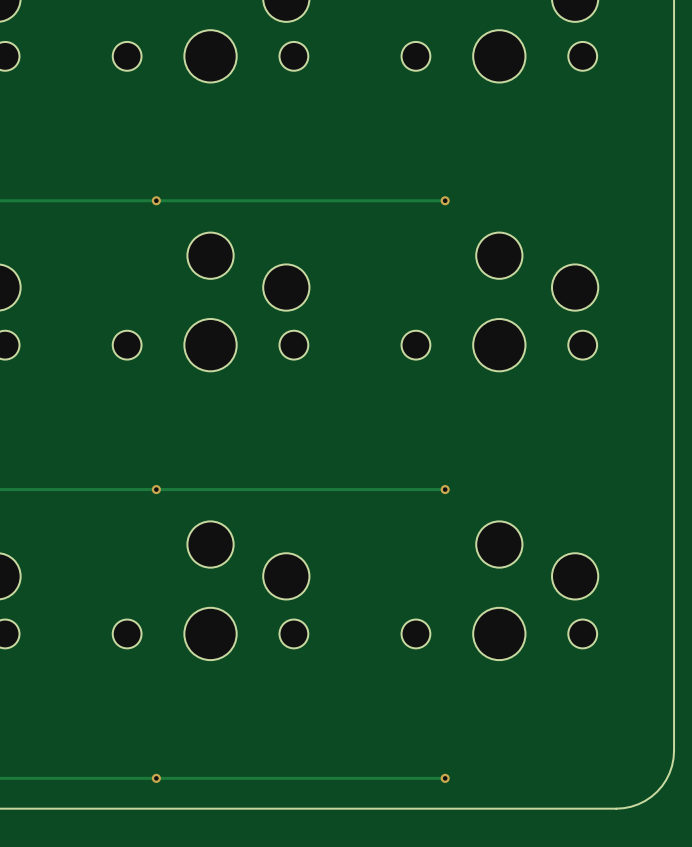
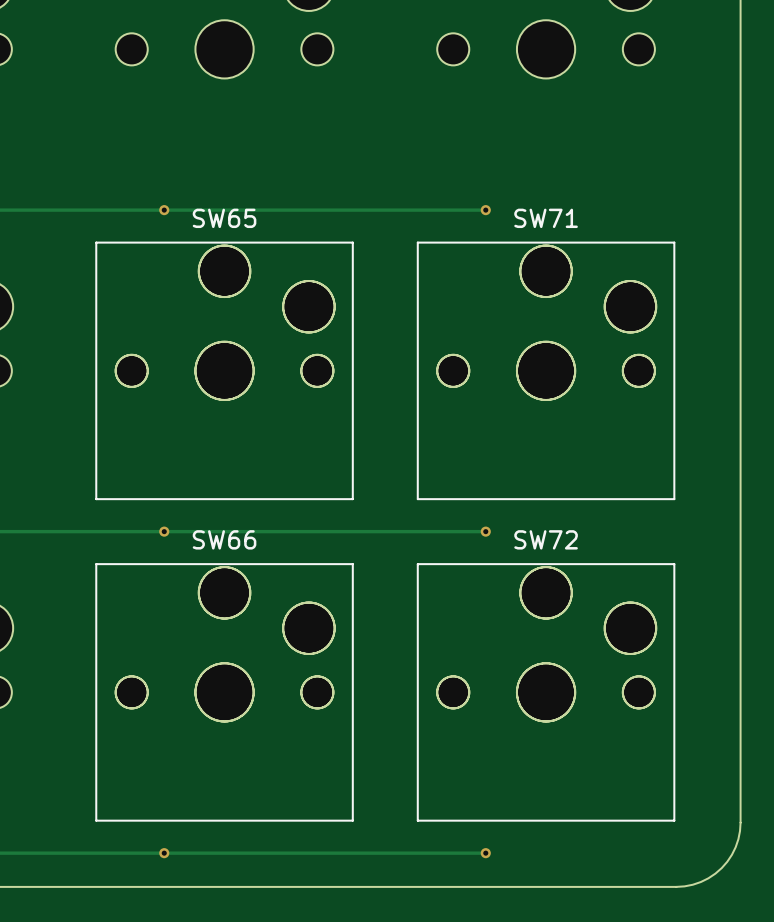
SW65: none -> (224, 370)
SW71: none -> (546, 370)
SW66: none -> (224, 692)
SW72: none -> (546, 692)

